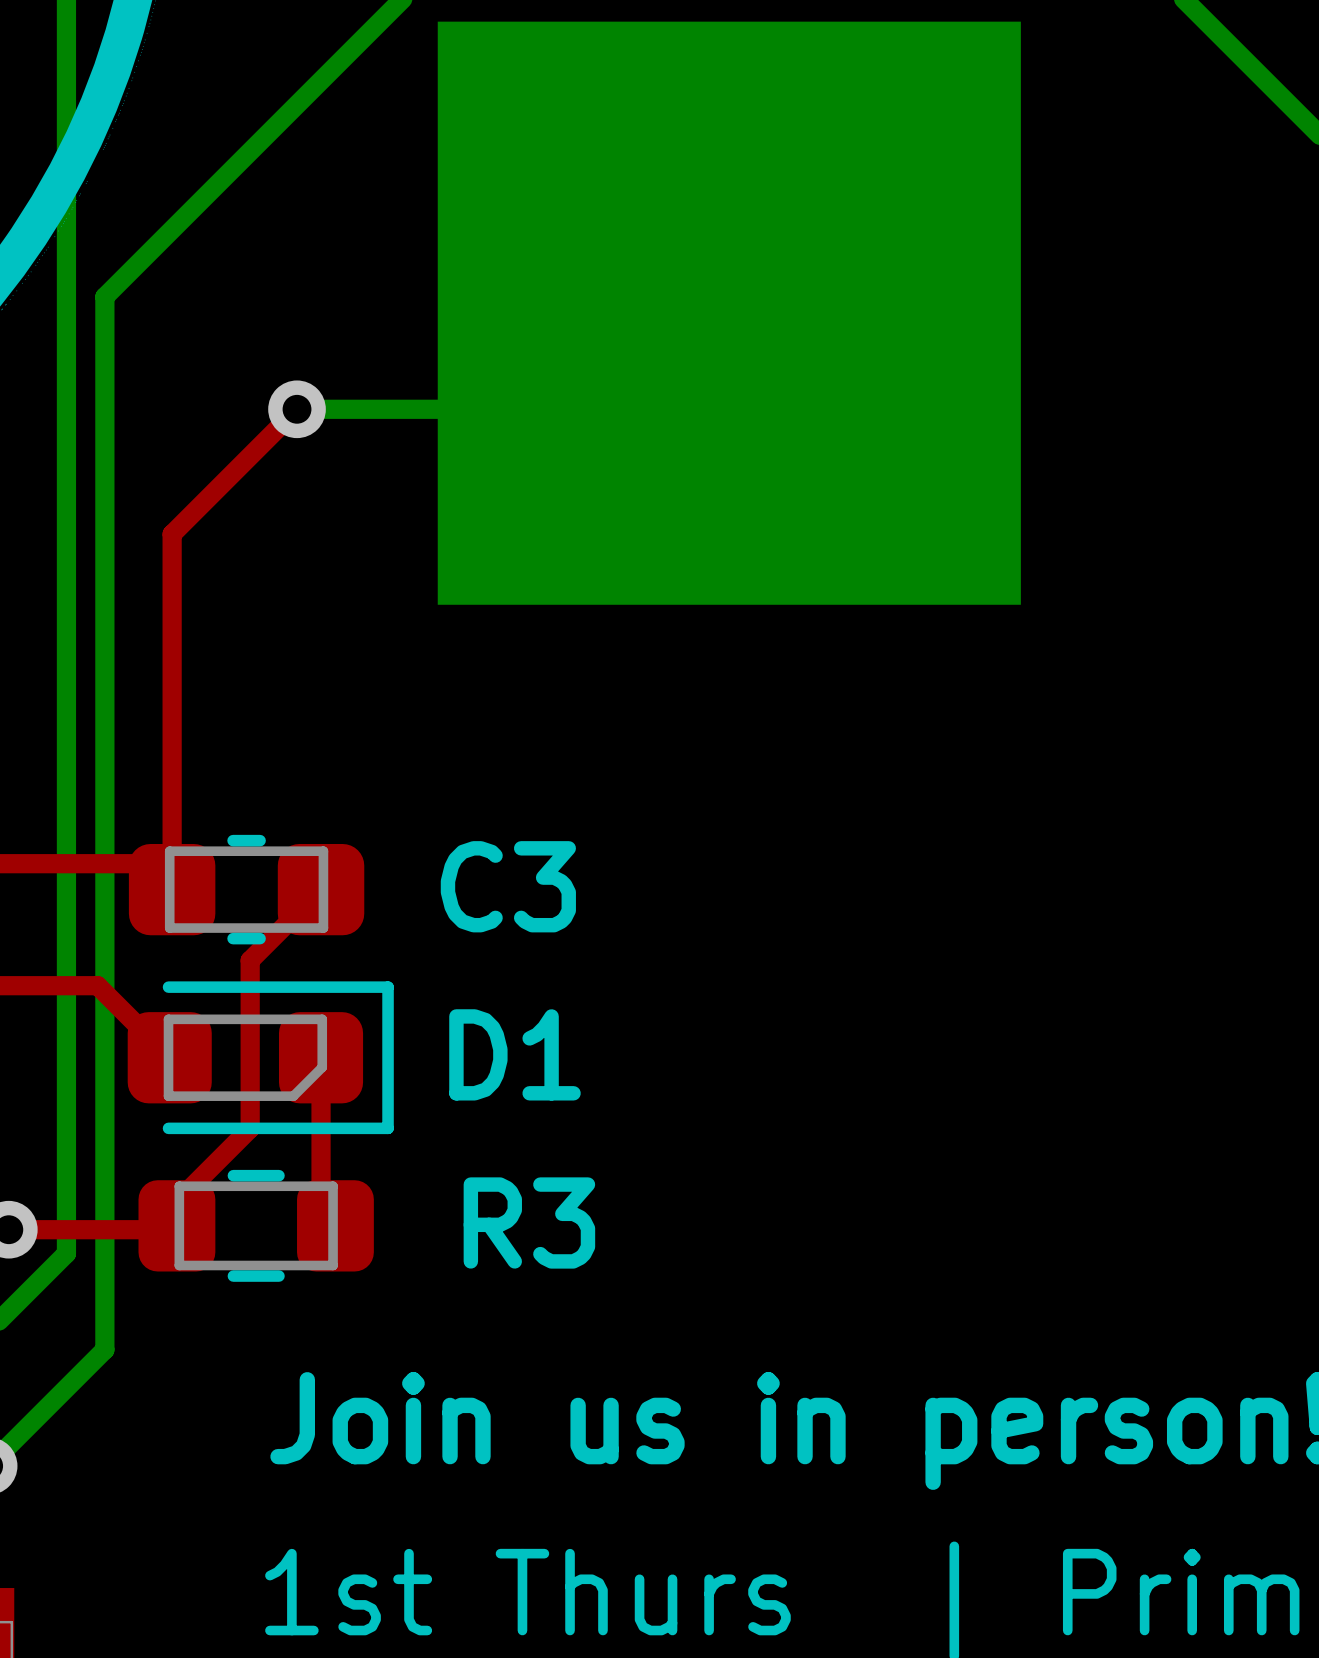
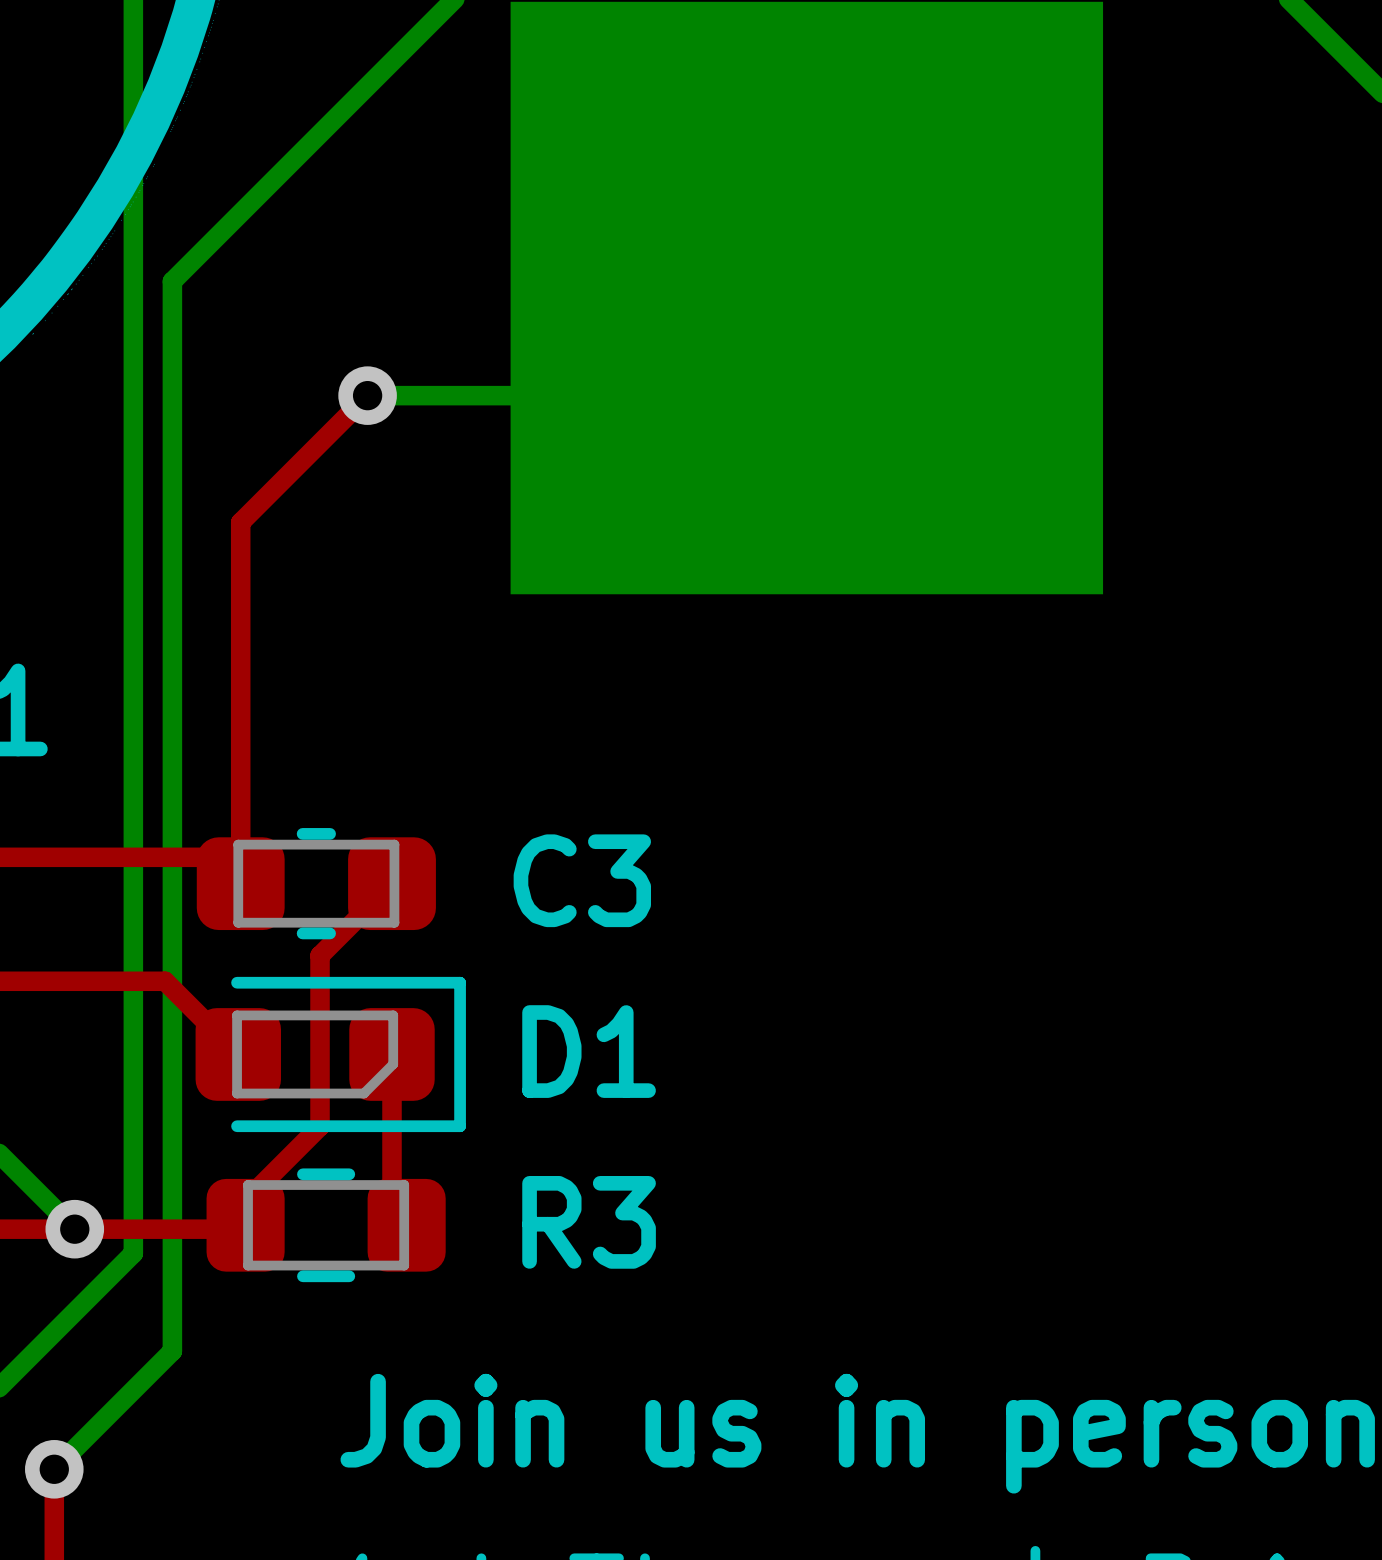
R3 name position: R3 (529, 1222) -> R3 (589, 1222)

